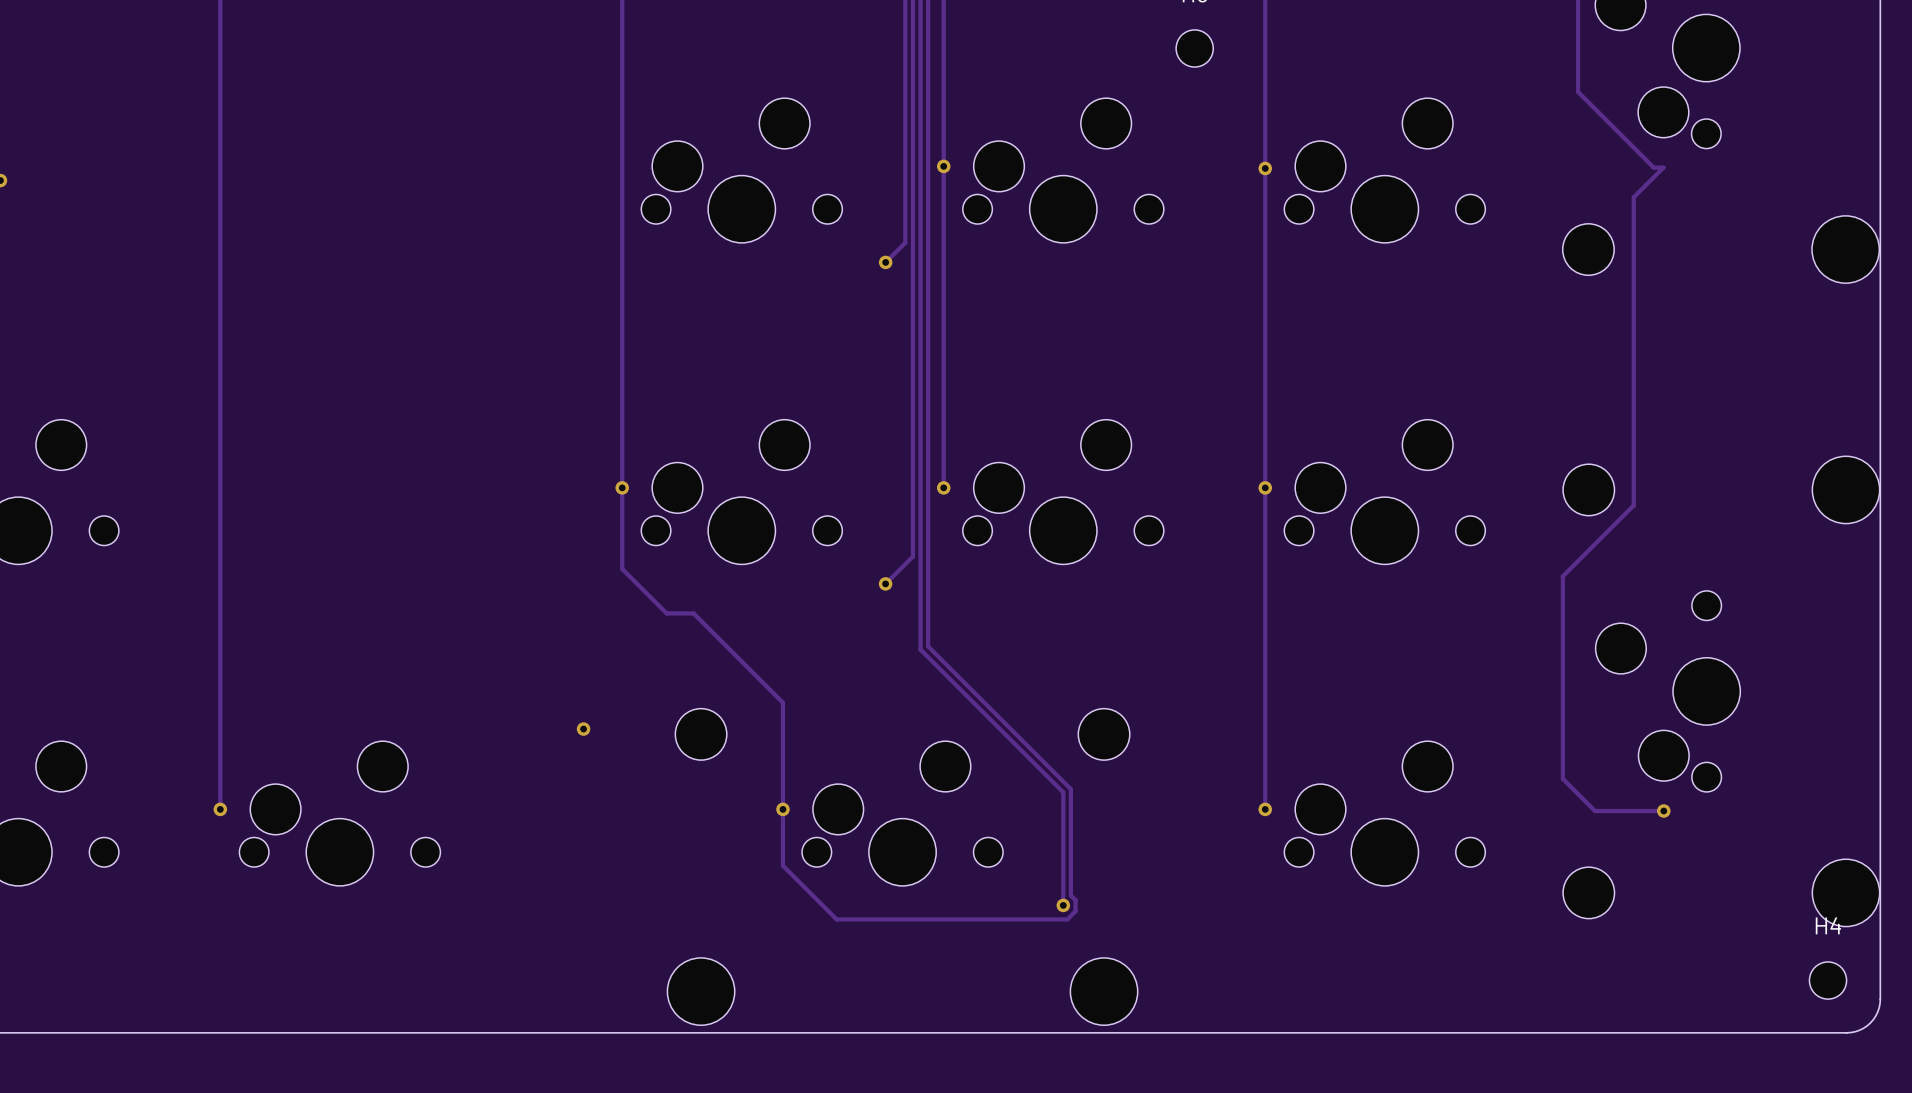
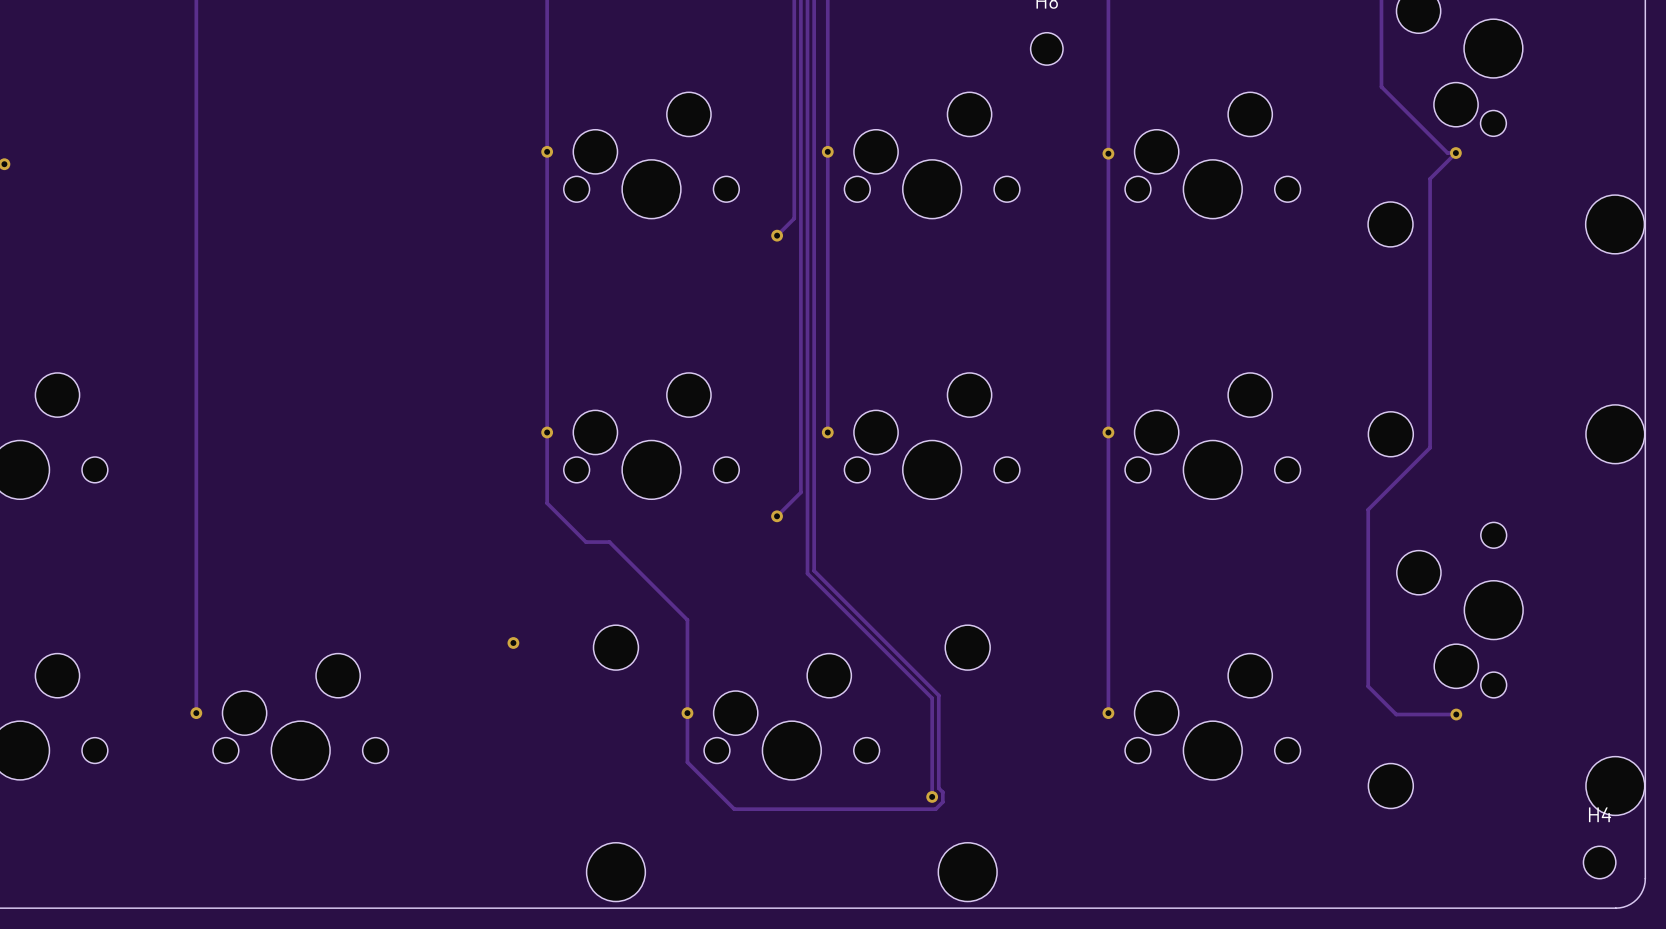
via: none -> (547, 151)
via: none -> (1455, 153)

